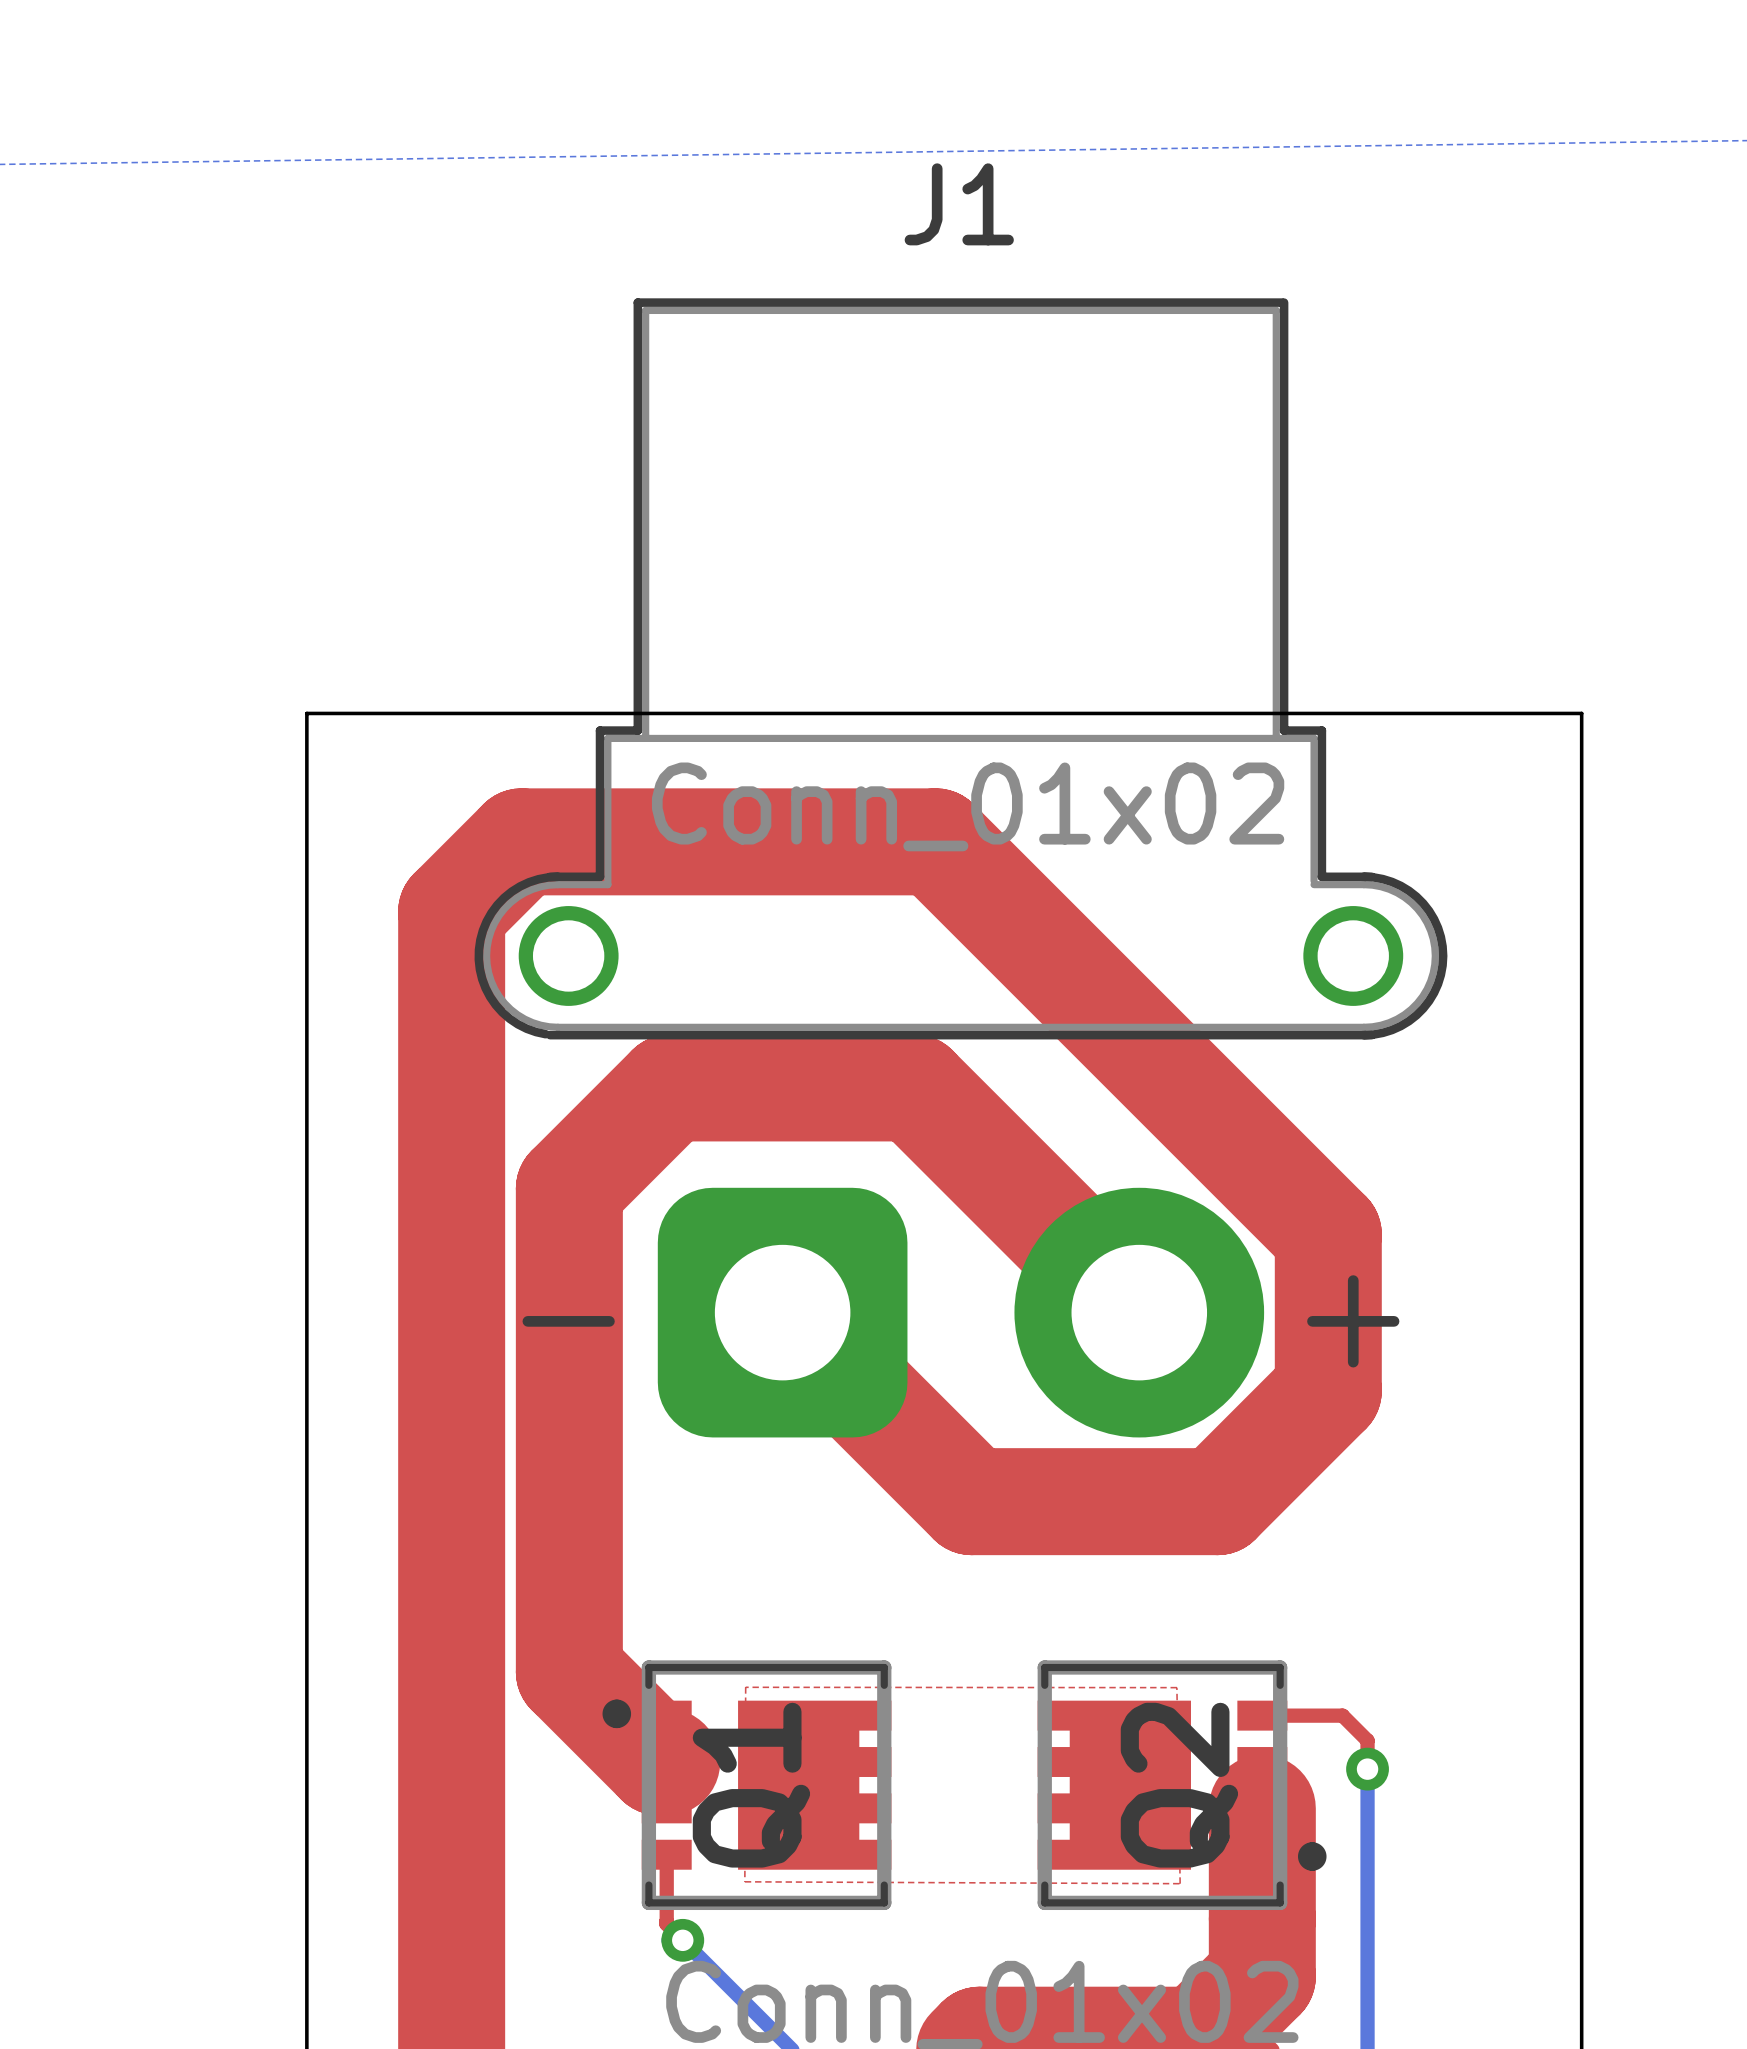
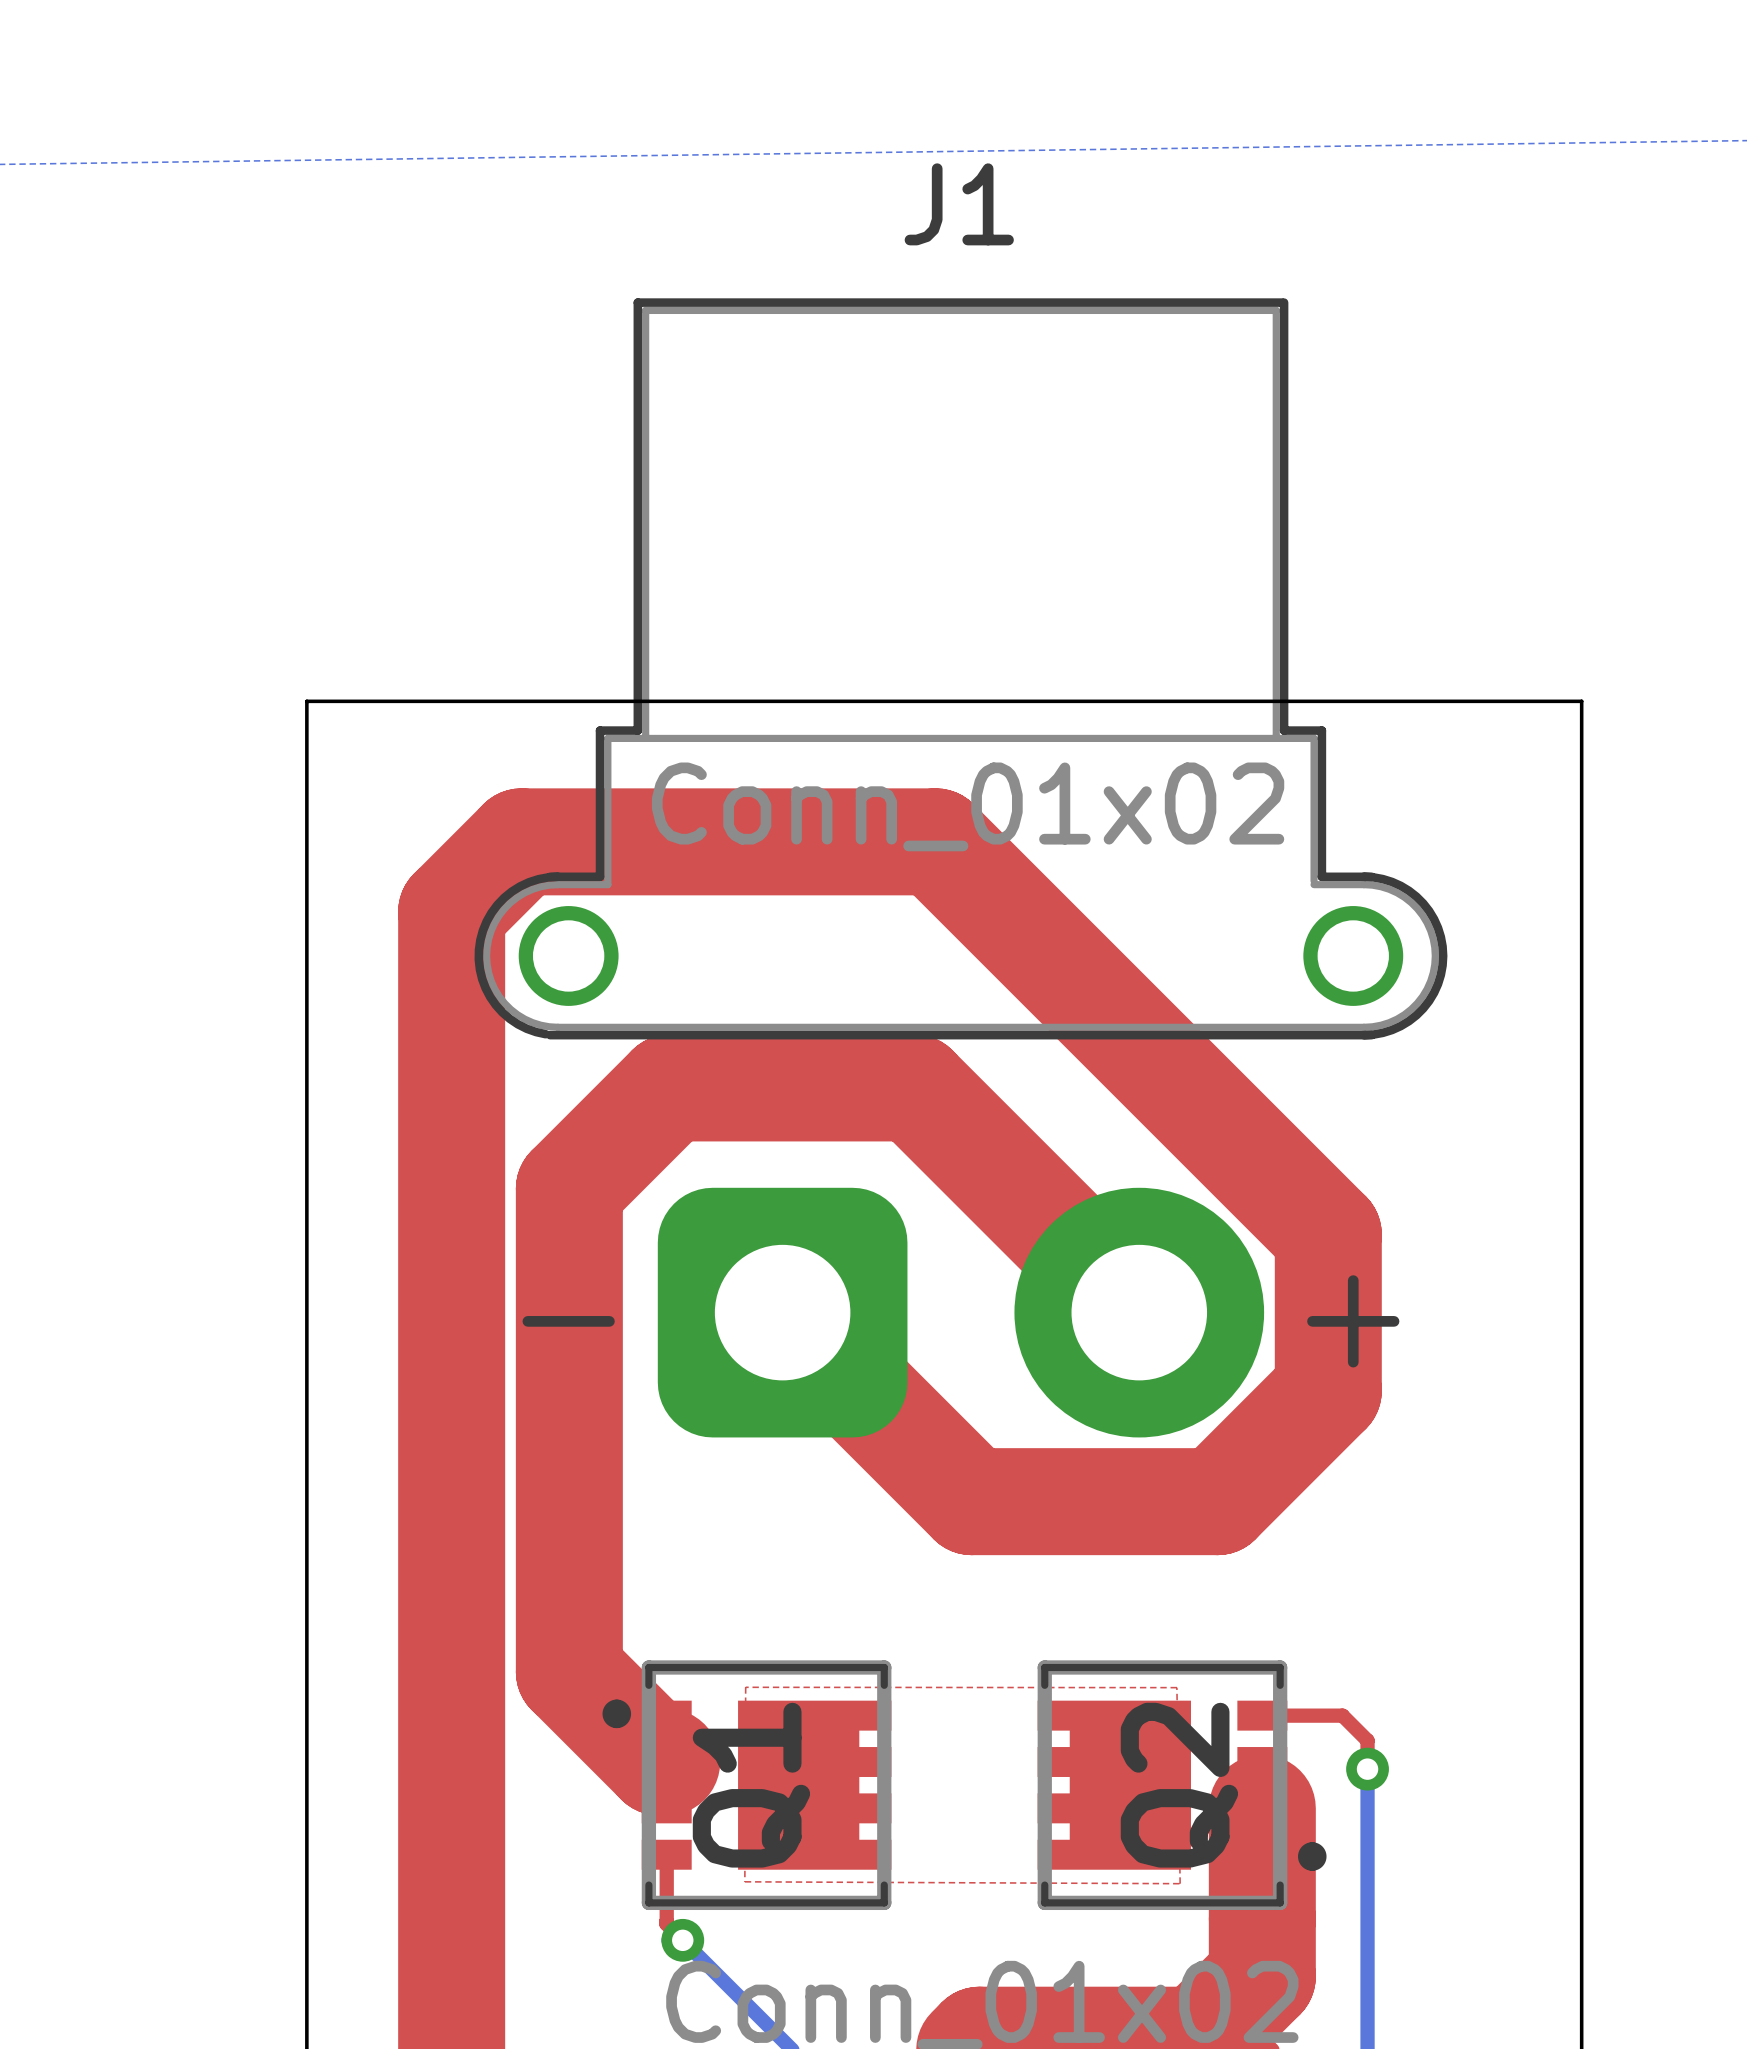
board edge: (306, 713) (1581, 713) -> (306, 713) (306, 701) (1581, 701) (1581, 713)

